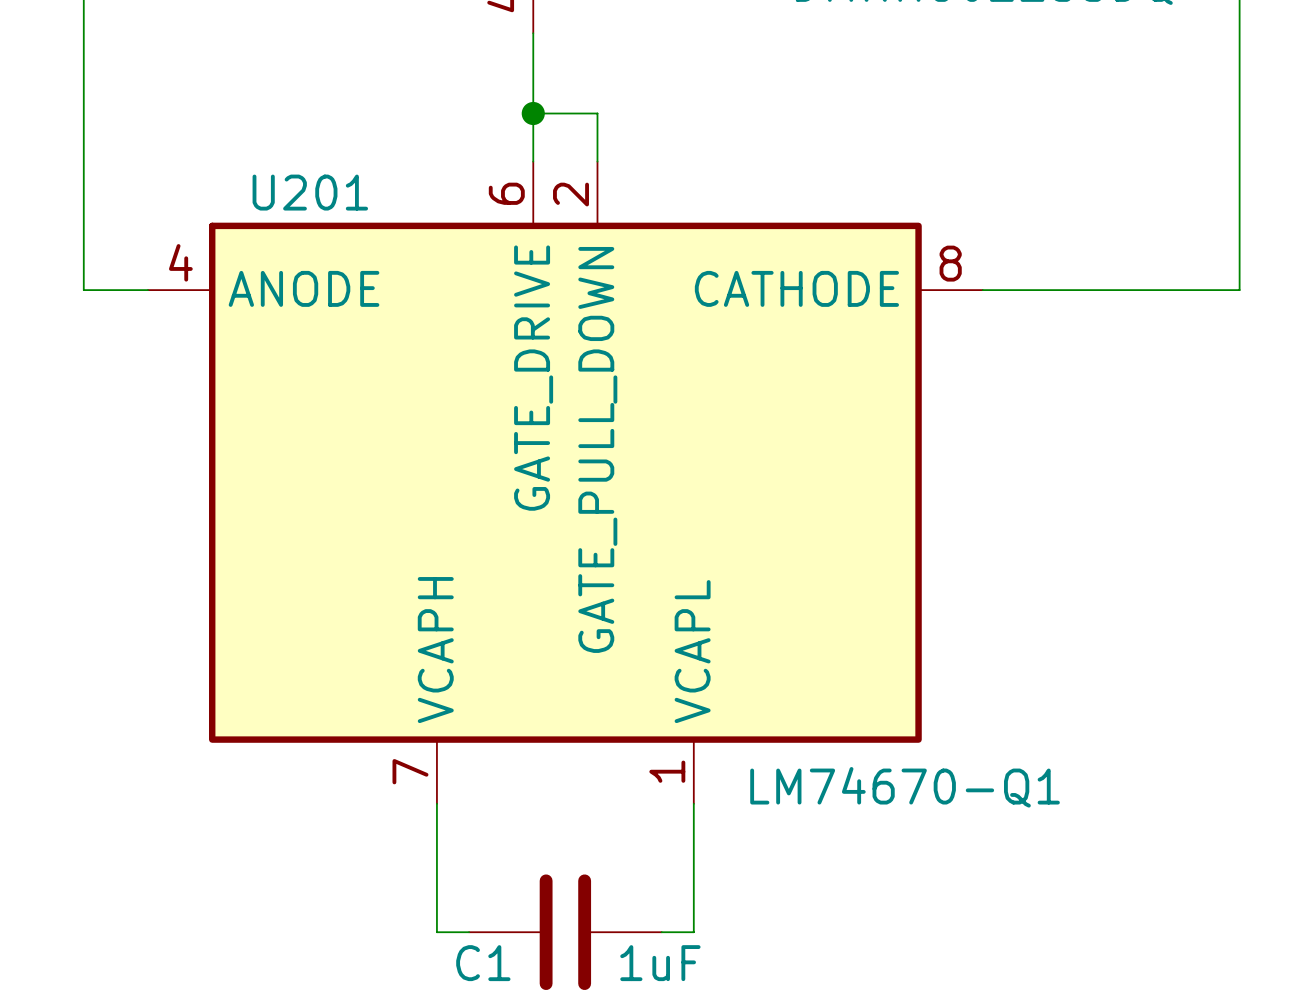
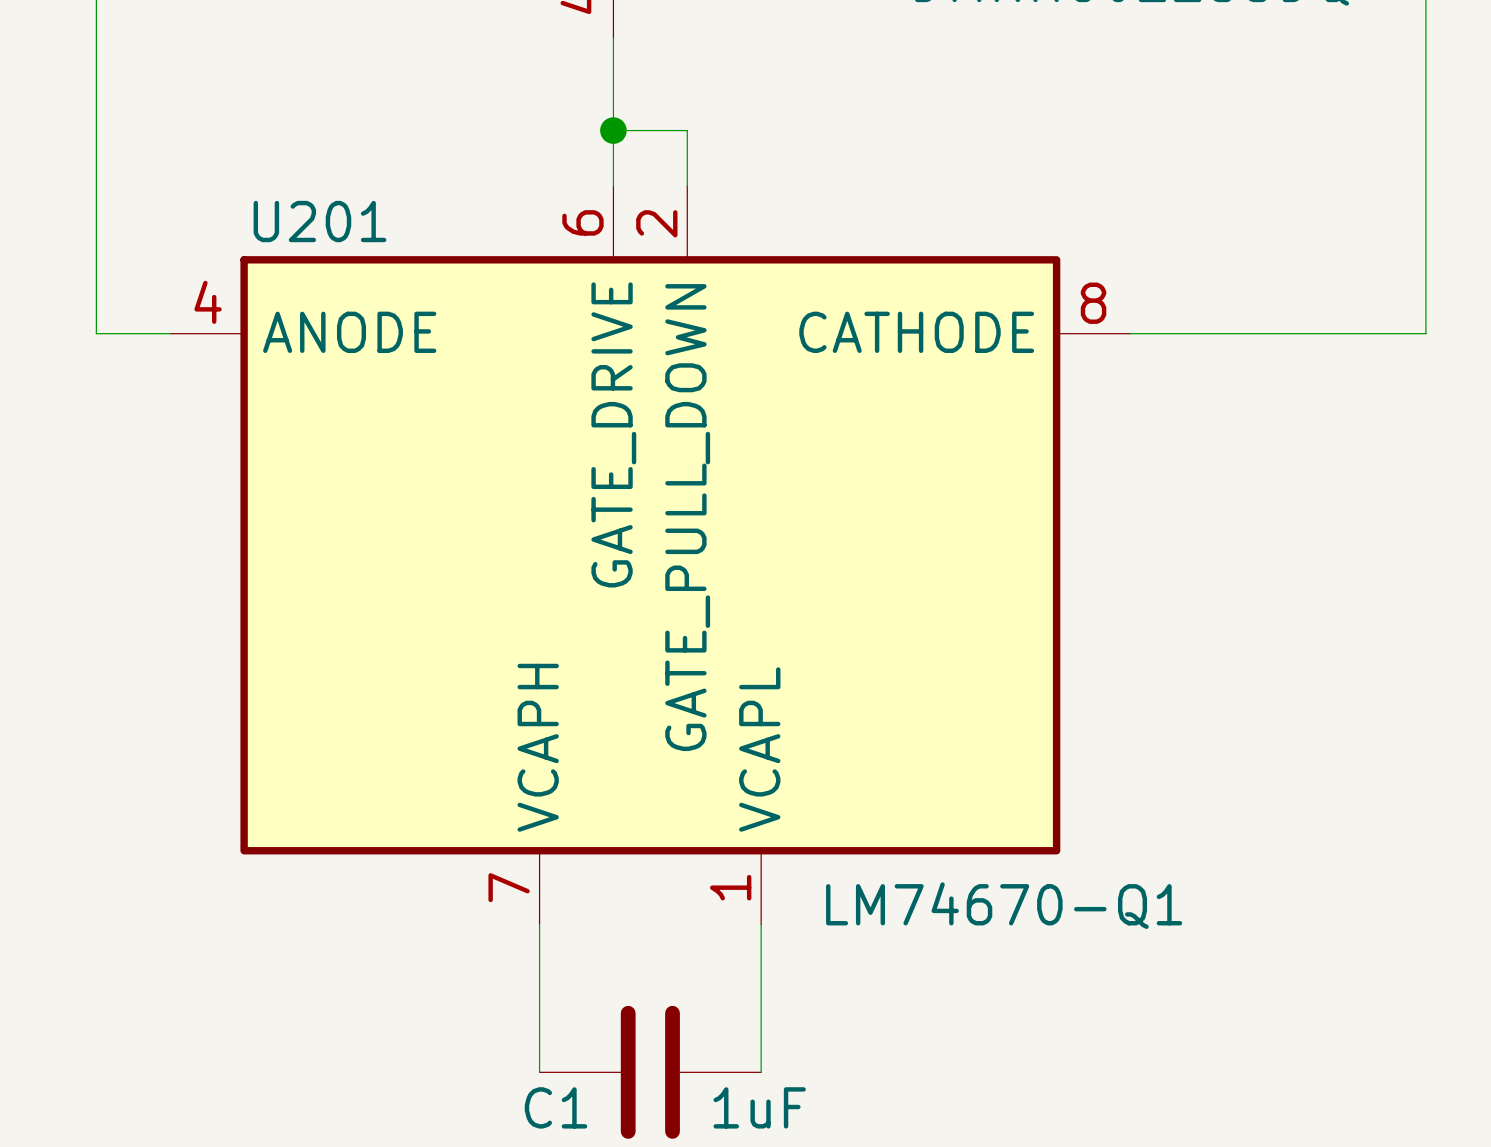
U201 symbol: [148, 161, 983, 804] -> [170, 185, 1131, 925]
wire: (436, 803) (436, 932) (469, 932) -> (539, 924) (539, 1072)
wire: (693, 803) (693, 932) (661, 932) -> (761, 924) (761, 1072)

